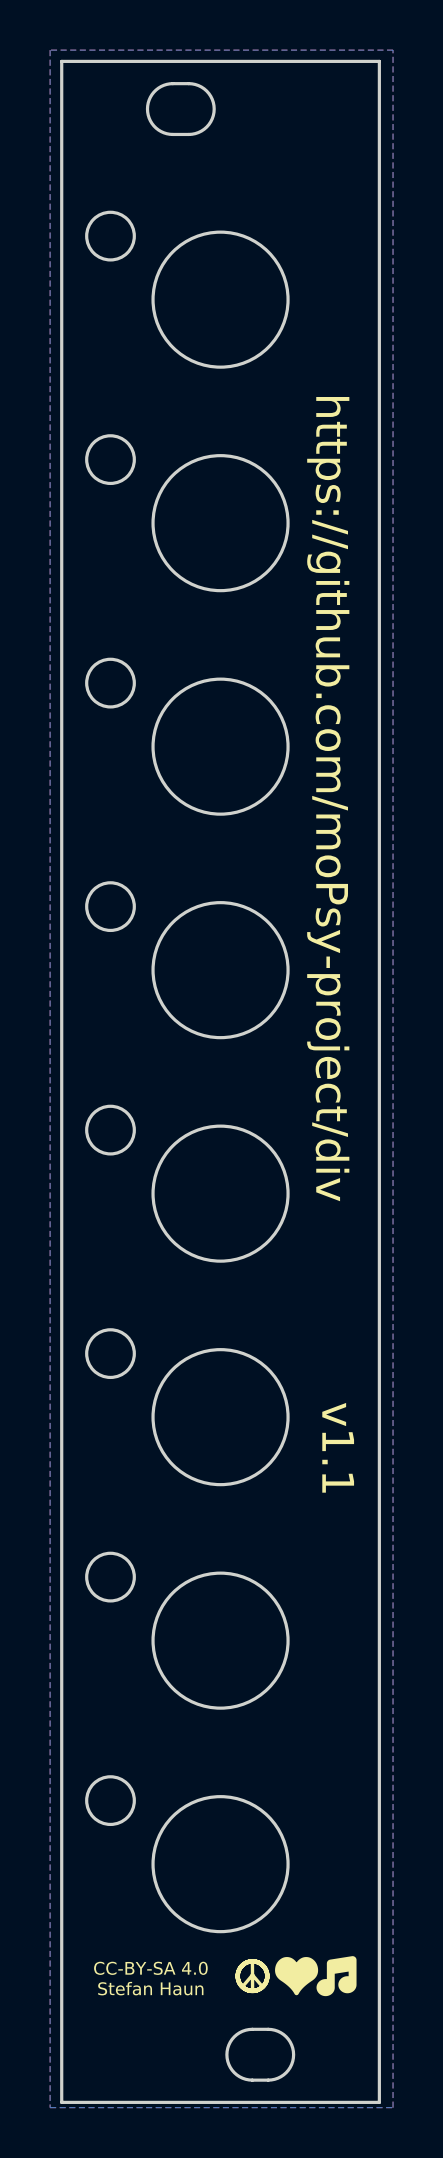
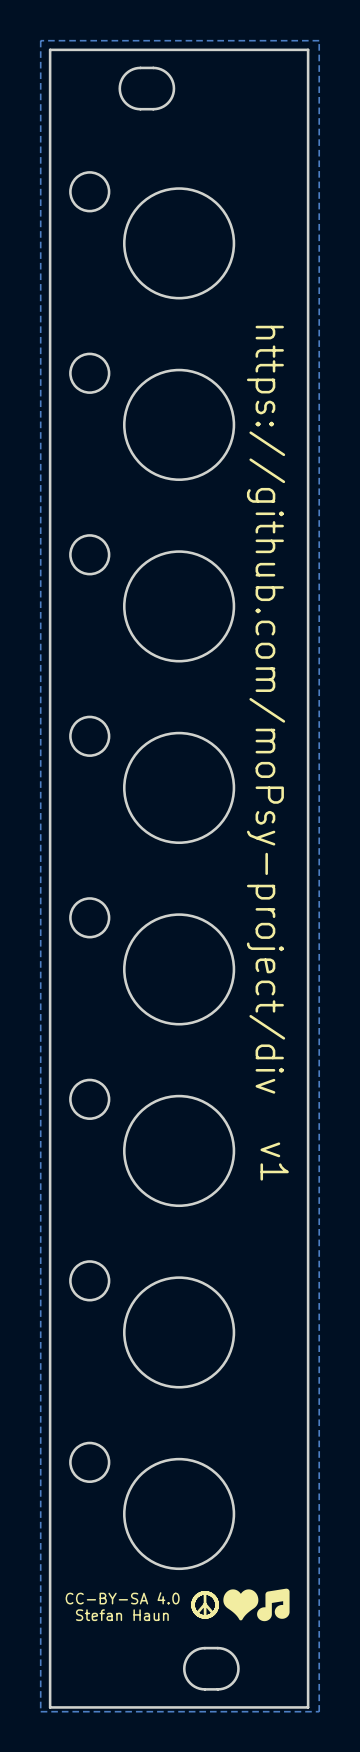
top zone outline: (393, 50) (50, 50) (50, 2107) (393, 2107) (393, 50) -> none
text: v1.1 (338, 1447) -> v1 (274, 1161)

